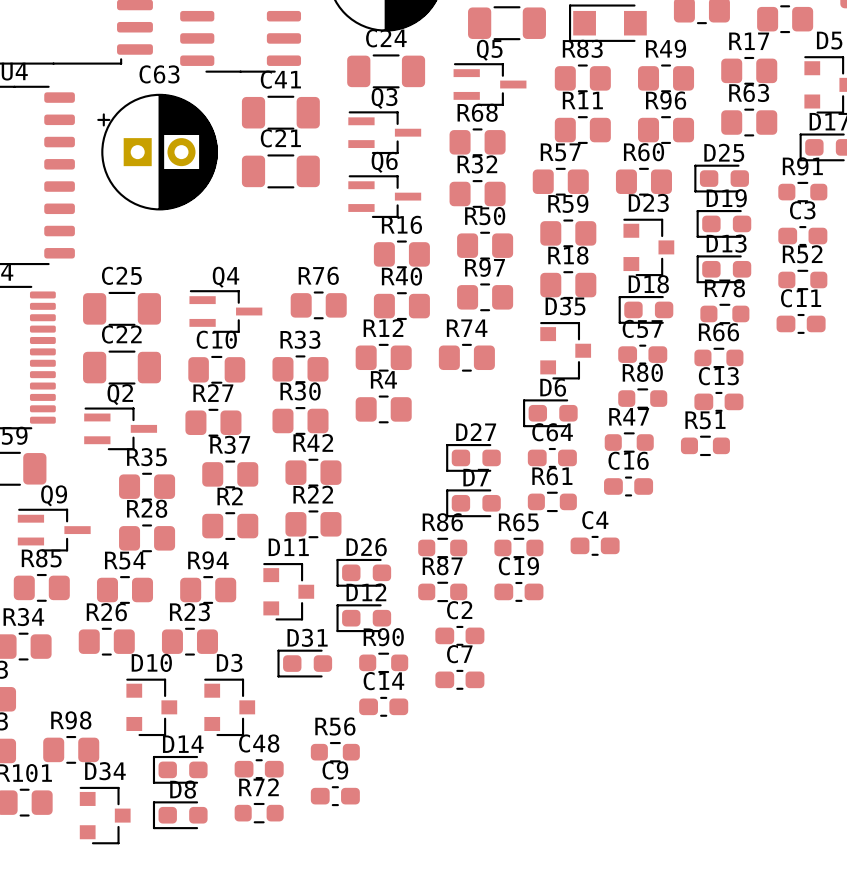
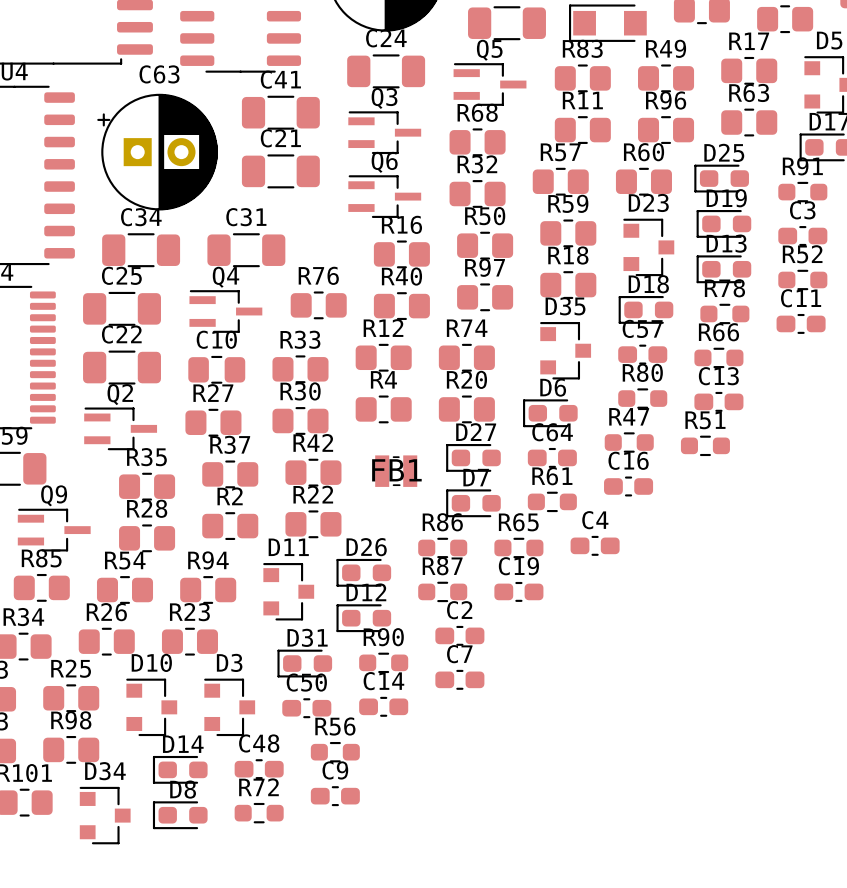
C34: none -> (141, 250)
C31: none -> (246, 250)
R20: none -> (466, 409)
FB1: none -> (396, 471)
R25: none -> (71, 698)
C50: none -> (306, 708)

